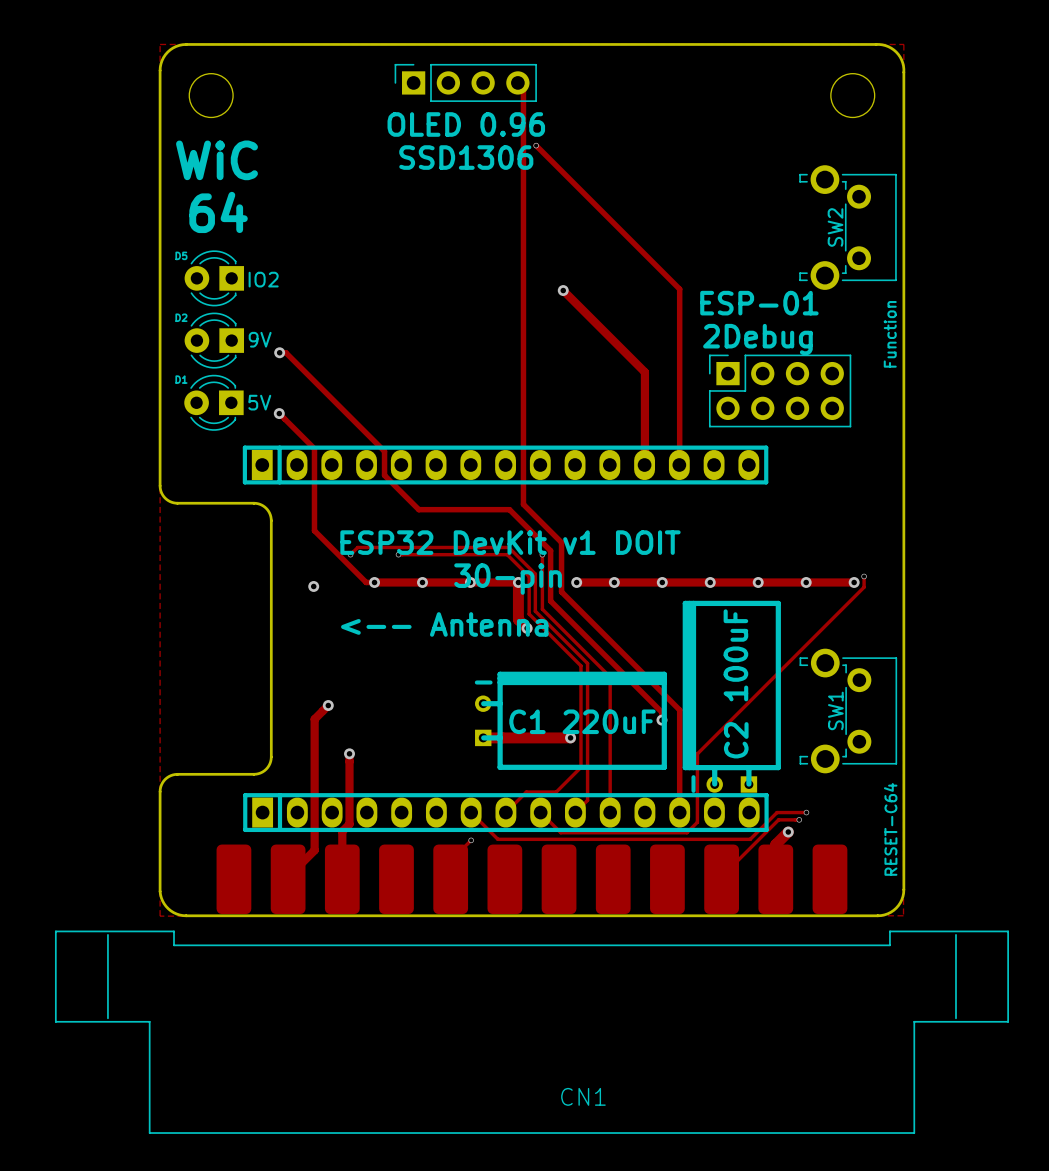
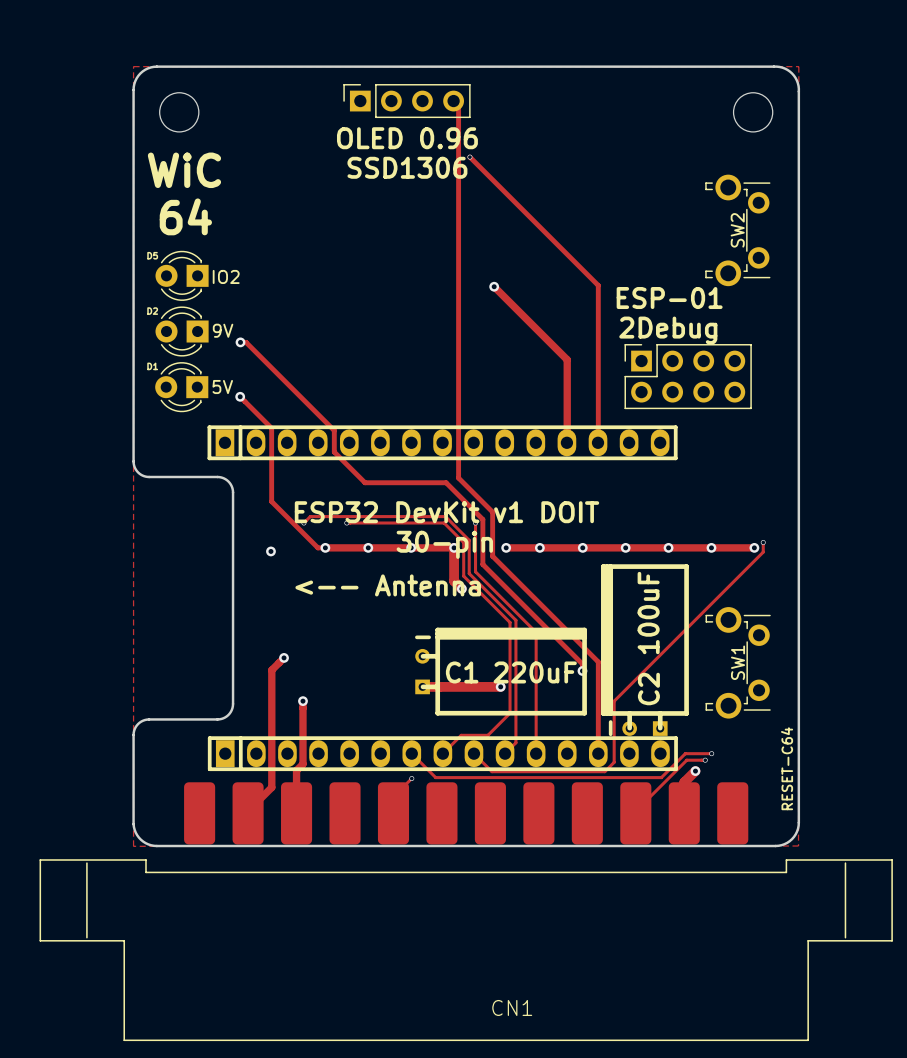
SW2 footprint: [799, 165, 897, 290] -> [705, 174, 771, 287]
SW2 value: Function (890, 334) -> none
SW1 footprint: [799, 648, 898, 774] -> [705, 607, 771, 719]

